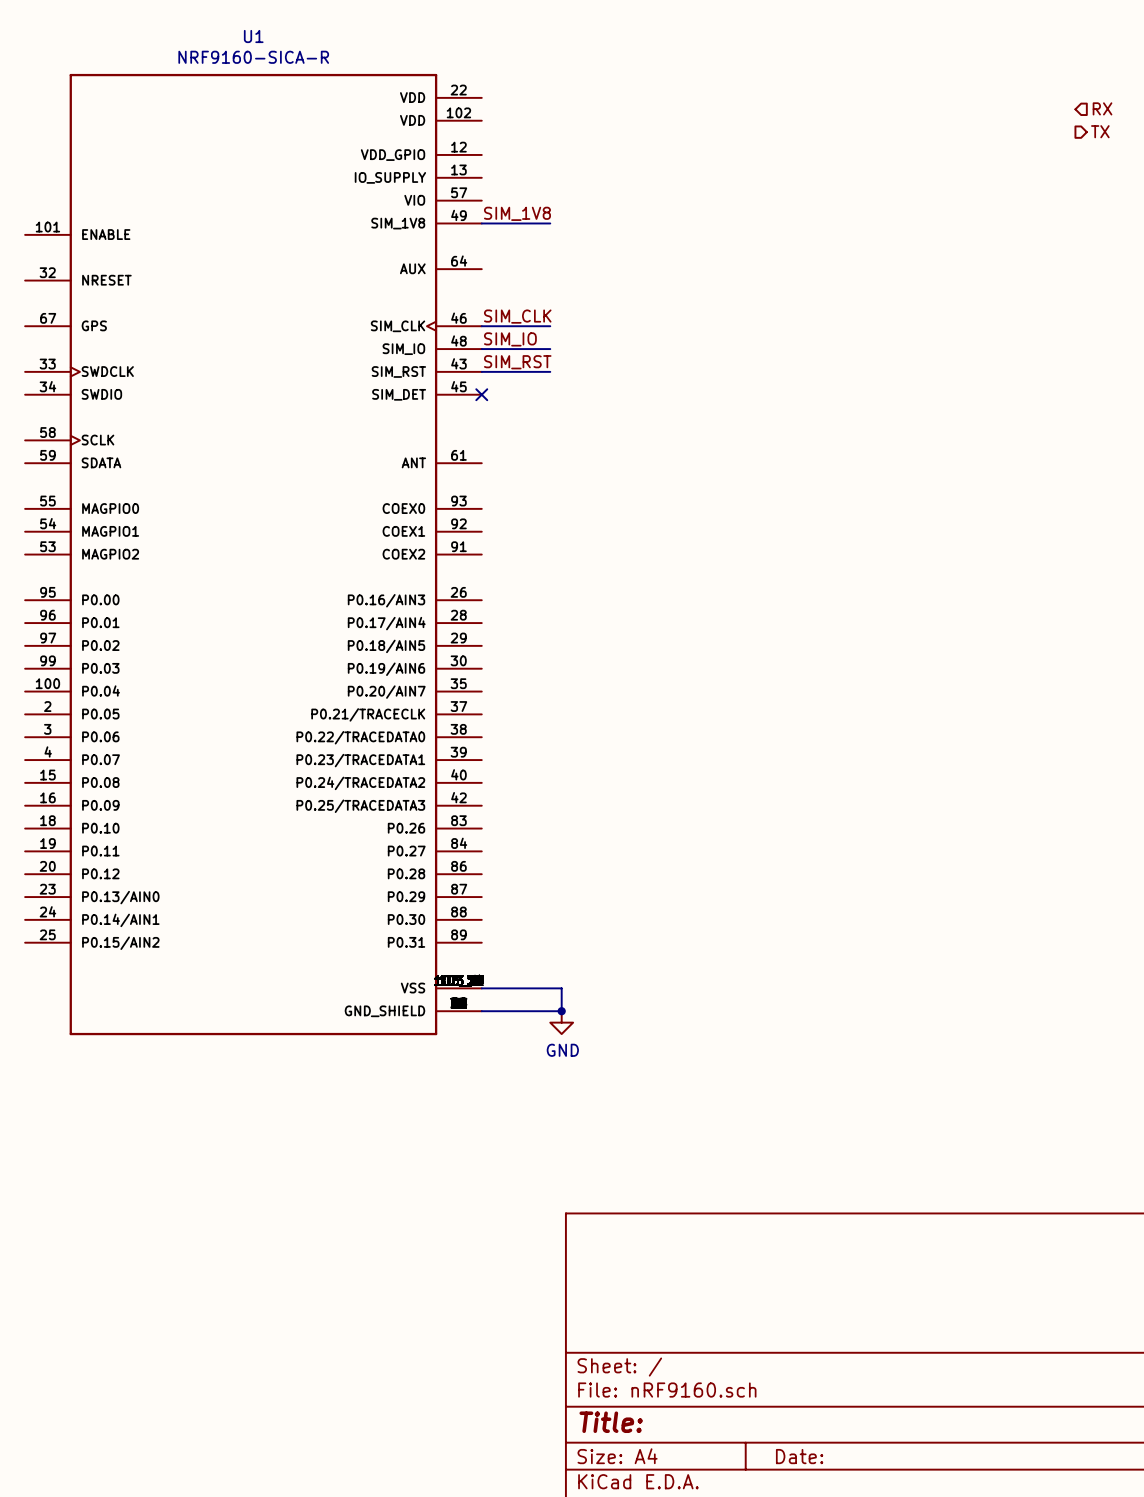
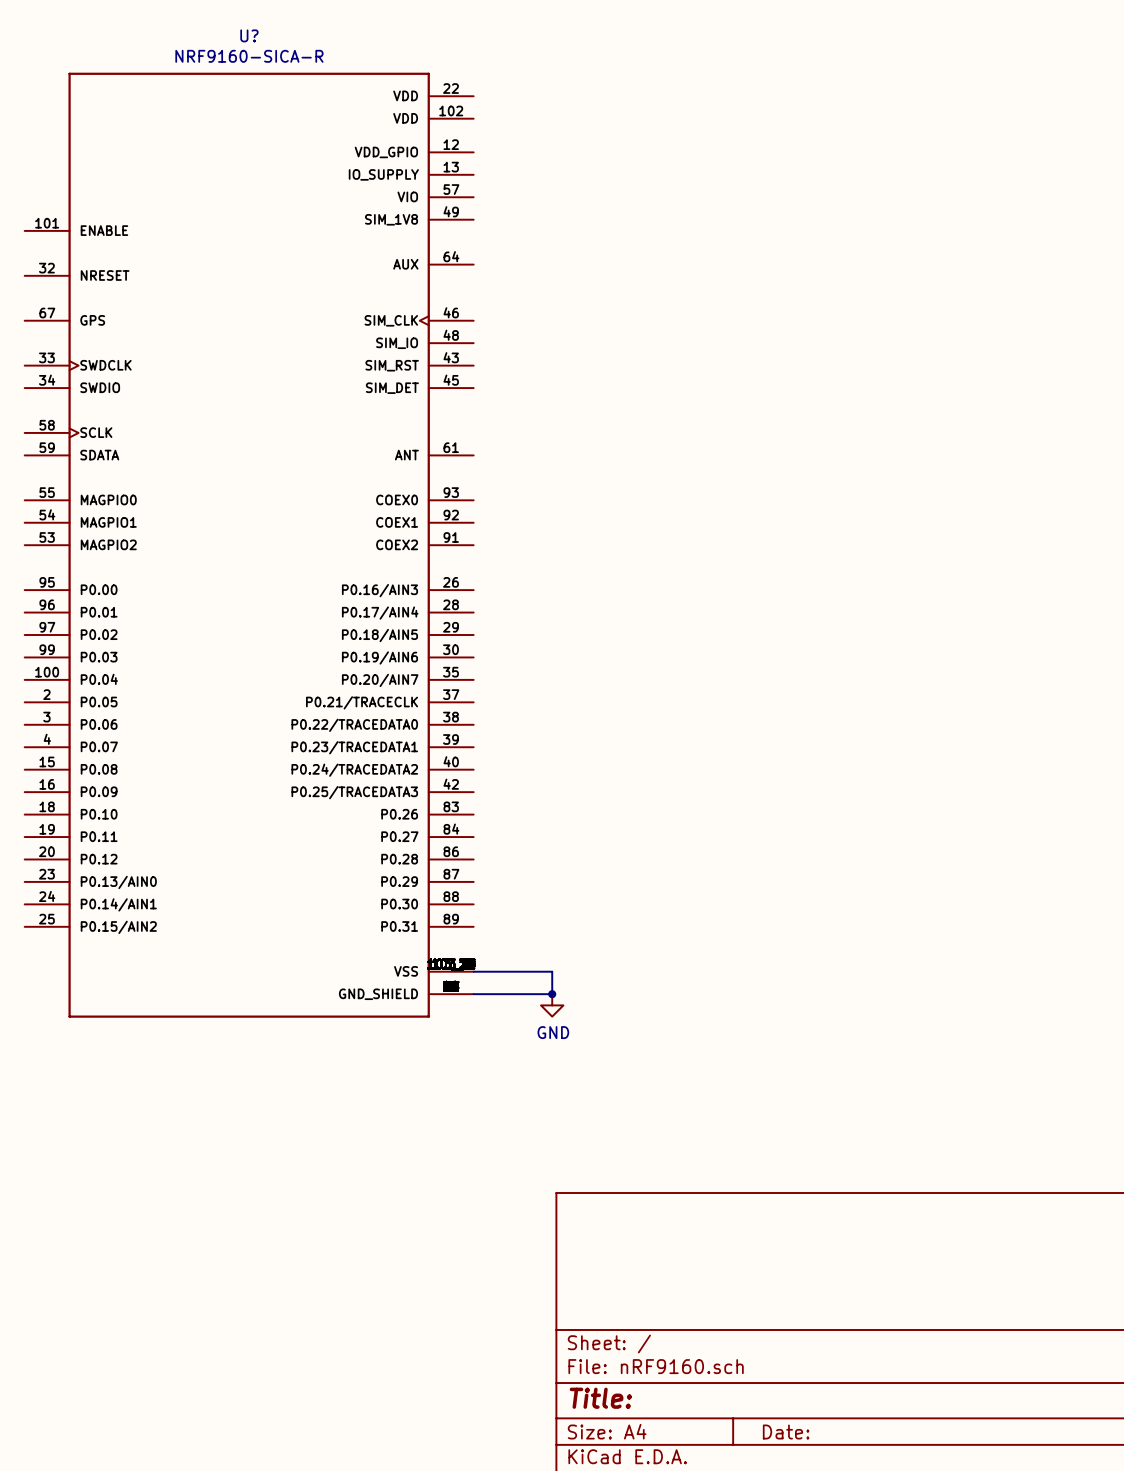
U1 name: U1 (253, 36) -> U? (249, 35)
hierarchical label: RX (1102, 108) -> none
hierarchical label: TX (1100, 131) -> none
label: SIM_1V8 (517, 213) -> none
wire: (481, 223) (550, 223) -> none
label: SIM_CLK (517, 316) -> none
wire: (481, 326) (550, 326) -> none
label: SIM_IO (510, 339) -> none
wire: (481, 349) (550, 349) -> none
label: SIM_RST (517, 362) -> none
wire: (481, 371) (550, 371) -> none
no-connect mark: (481, 394) -> none

